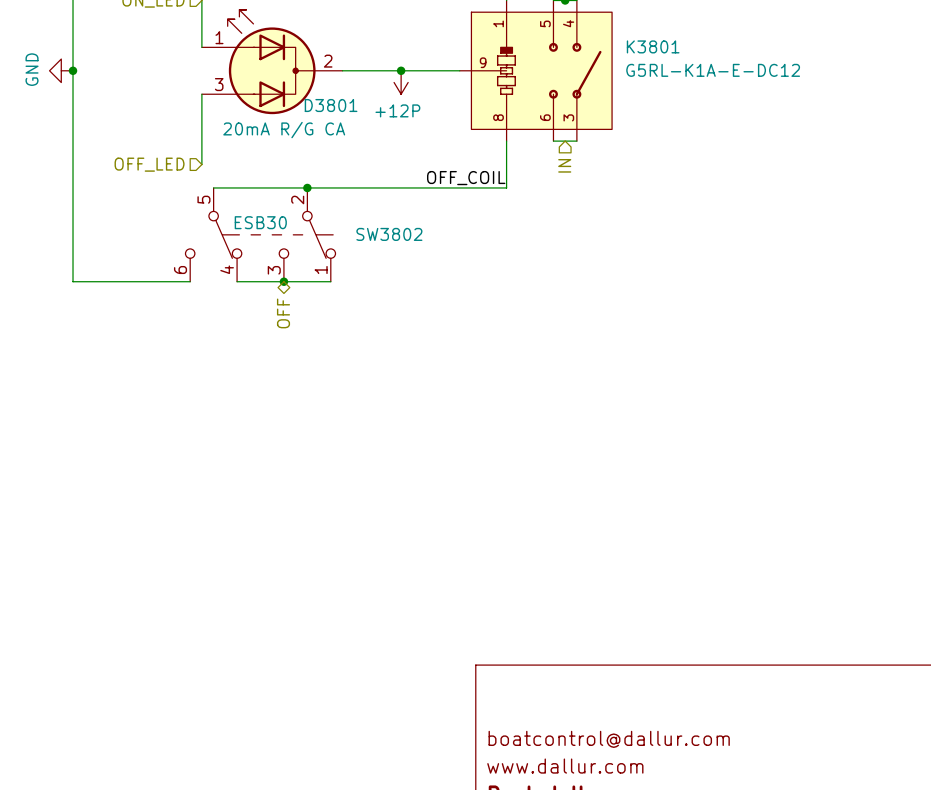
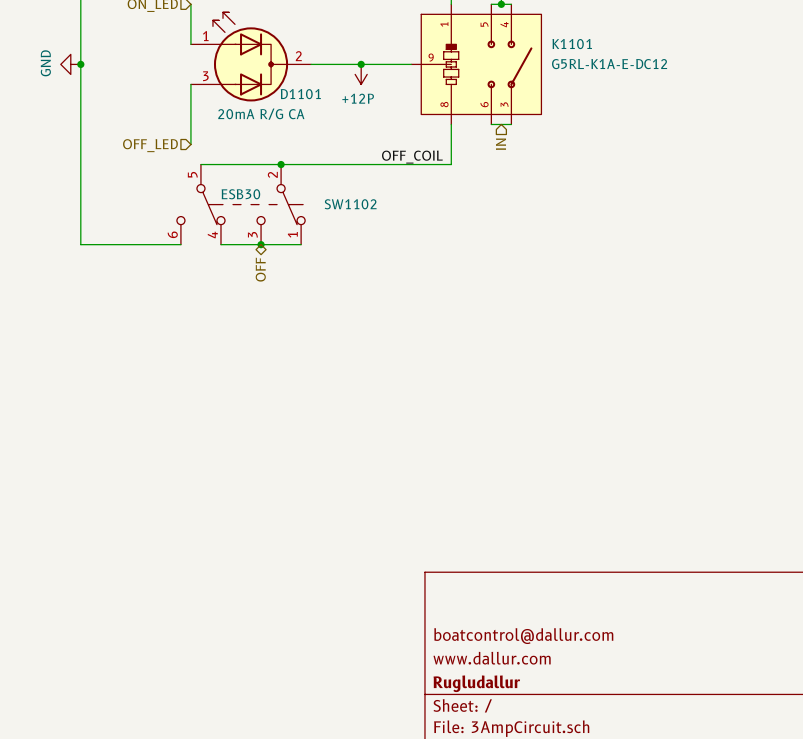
K3801 name: K3801 (653, 46) -> K1101 (572, 44)
D3801 name: D3801 (331, 105) -> D1101 (300, 94)
SW3802 name: SW3802 (389, 234) -> SW1102 (350, 204)

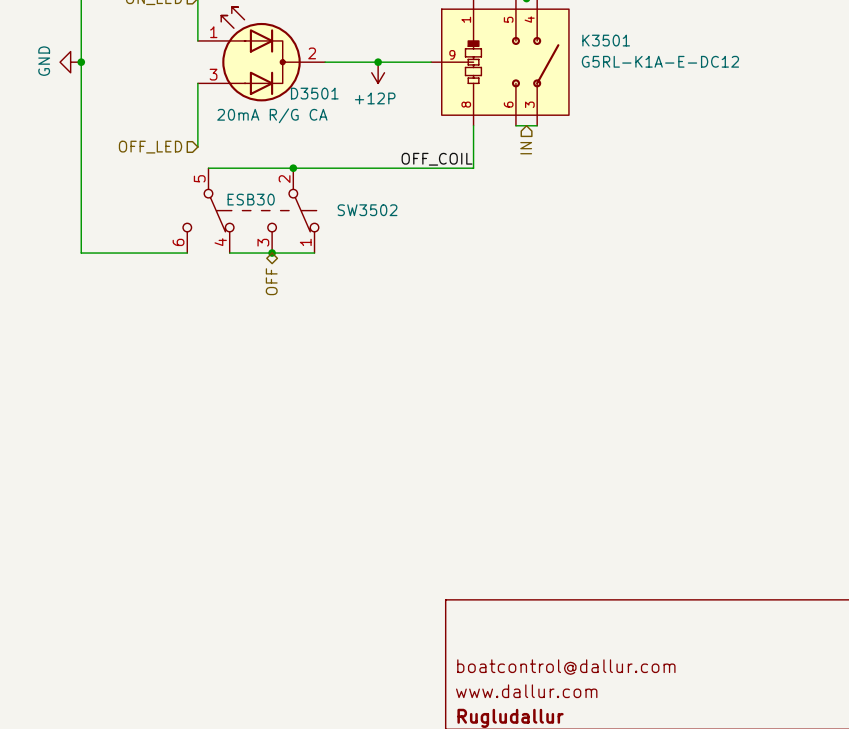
K1101 name: K1101 (572, 44) -> K3501 (606, 40)
D1101 name: D1101 (300, 94) -> D3501 (314, 93)
SW1102 name: SW1102 (350, 204) -> SW3502 (367, 210)

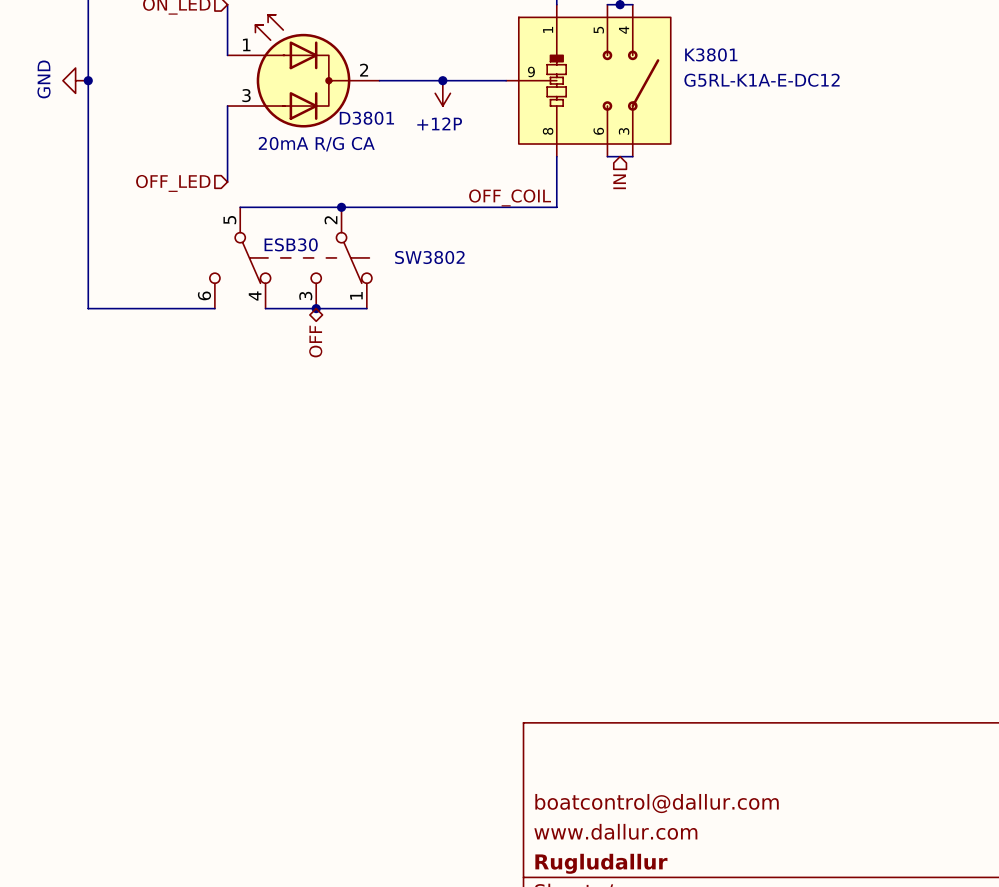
K3501 name: K3501 (606, 40) -> K3801 (711, 54)
D3501 name: D3501 (314, 93) -> D3801 (366, 118)
SW3502 name: SW3502 (367, 210) -> SW3802 (429, 257)

